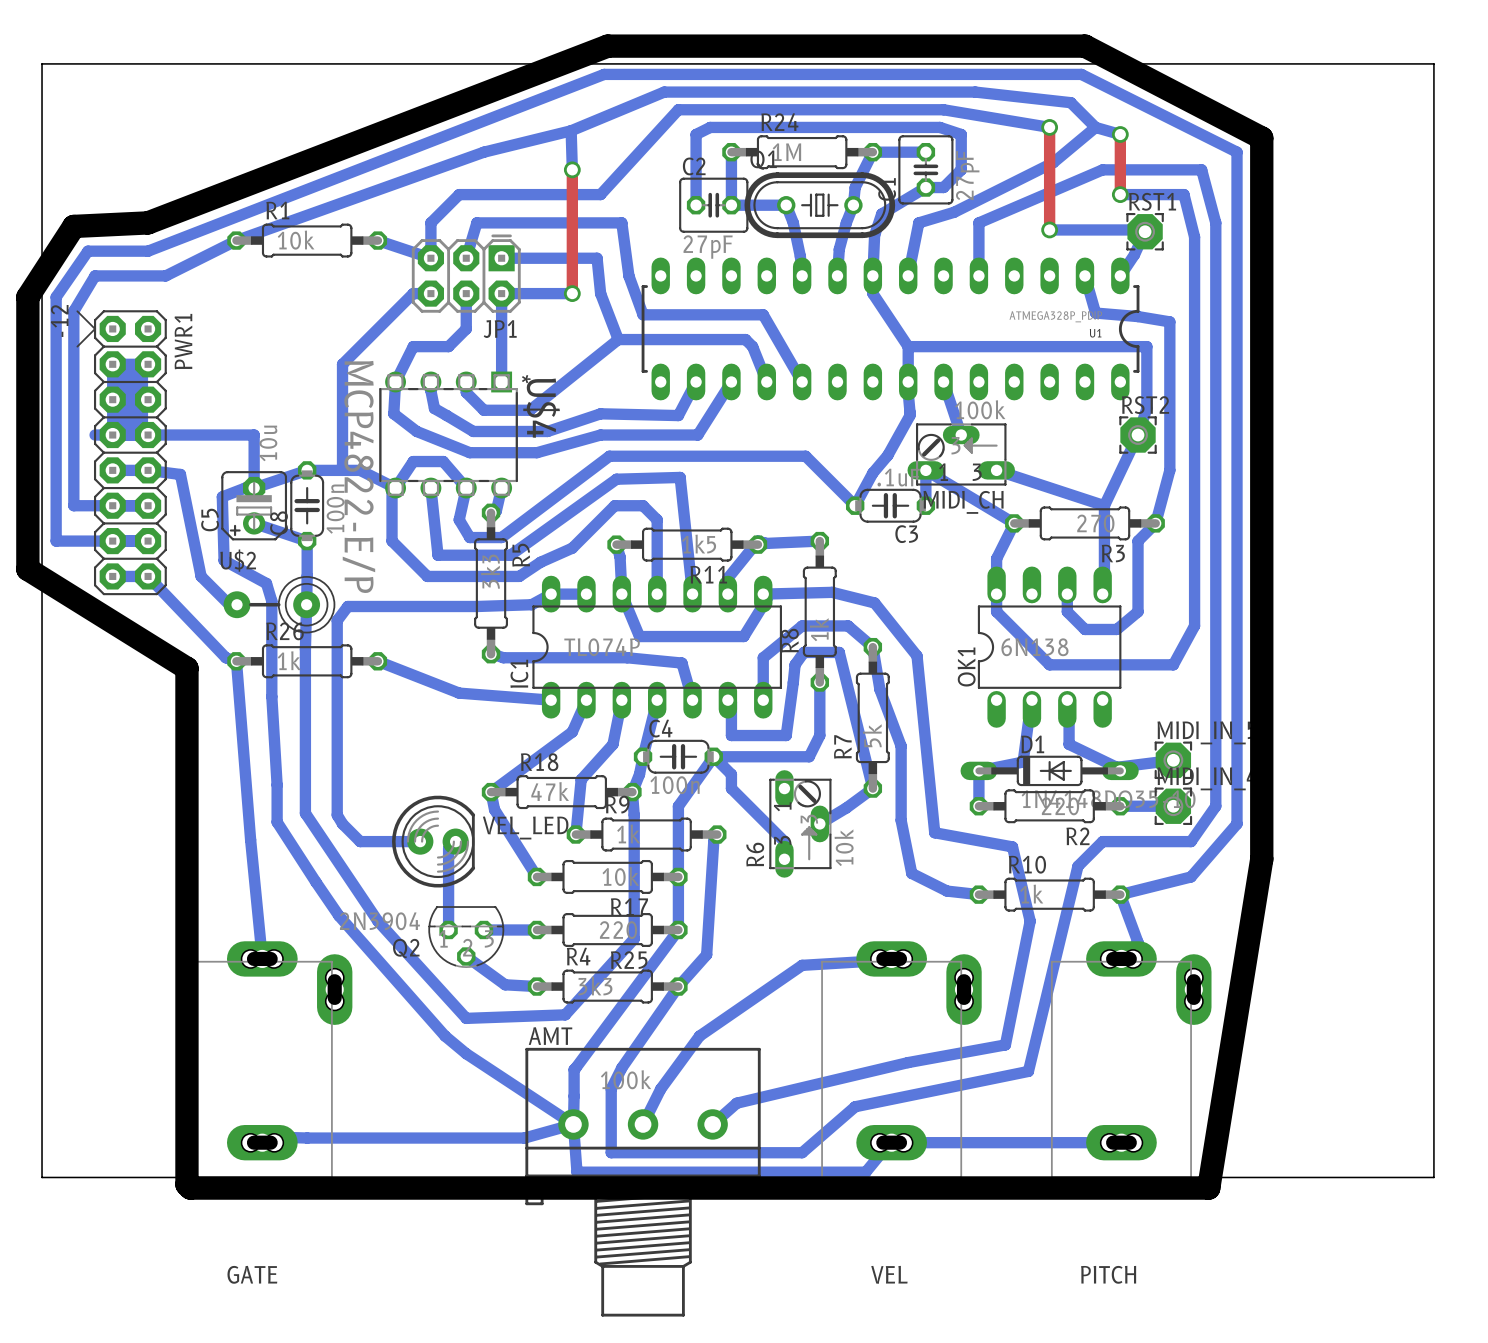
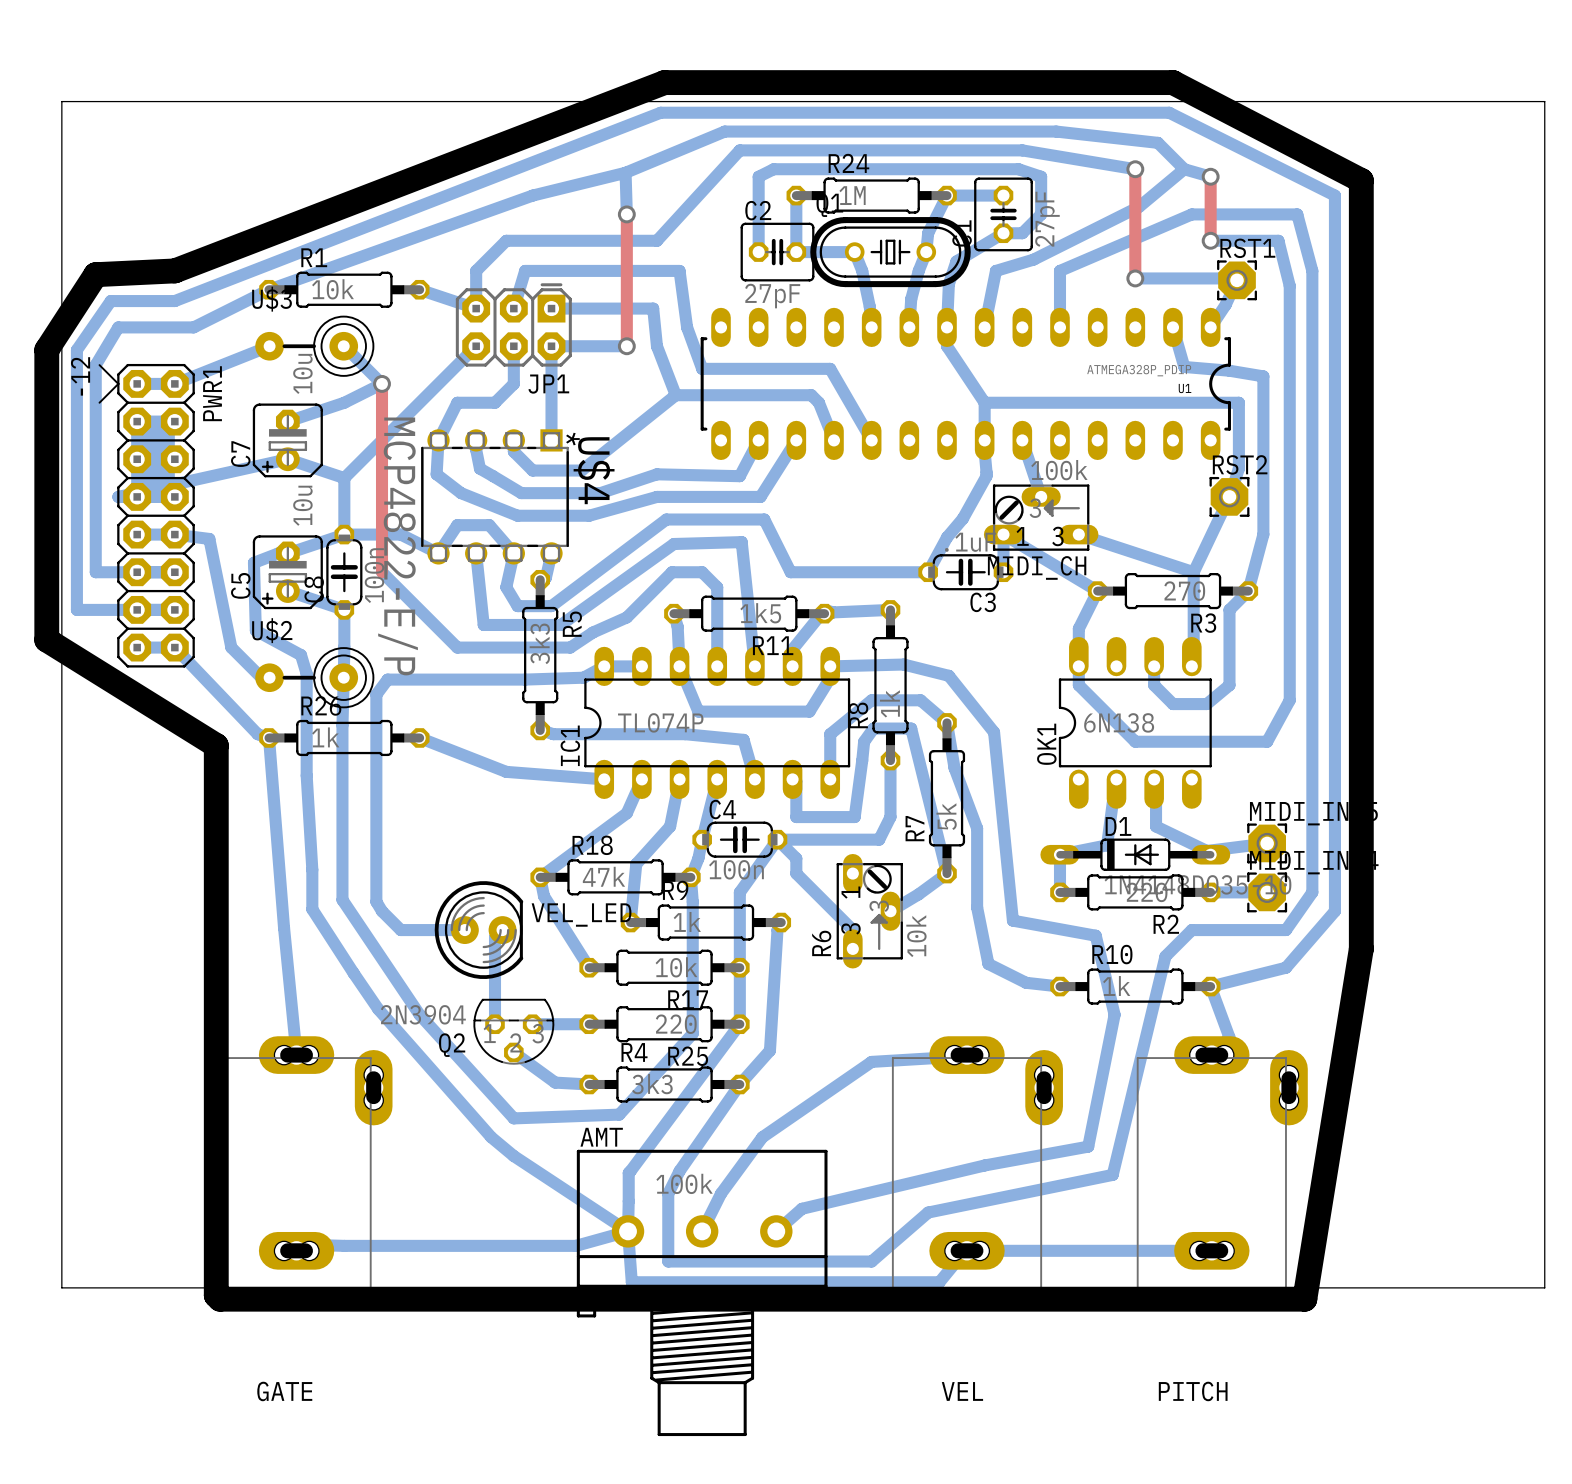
bottom track: none -> (269, 346) (174, 383) (137, 383)
U$3: none -> (314, 346)
bottom track: none -> (343, 346) (382, 383) (344, 402) (287, 421)
bottom track: (430, 293) (413, 293) (342, 364) (342, 470) -> (476, 346) (344, 478)
top track: none -> (382, 383) (382, 572)
via: none -> (382, 383)
C7: none -> 10u (287, 440)
bottom track: none -> (344, 478) (344, 534)
bottom track: none -> (344, 478) (287, 459) (118, 496)
bottom track: (148, 435) (254, 435) (254, 488) -> none
bottom track: (701, 456) (805, 456) (855, 505) -> (764, 519) (790, 572) (928, 572)
bottom track: (395, 488) (392, 491) (392, 541) (427, 576) -> (382, 572) (457, 647) (472, 647)

